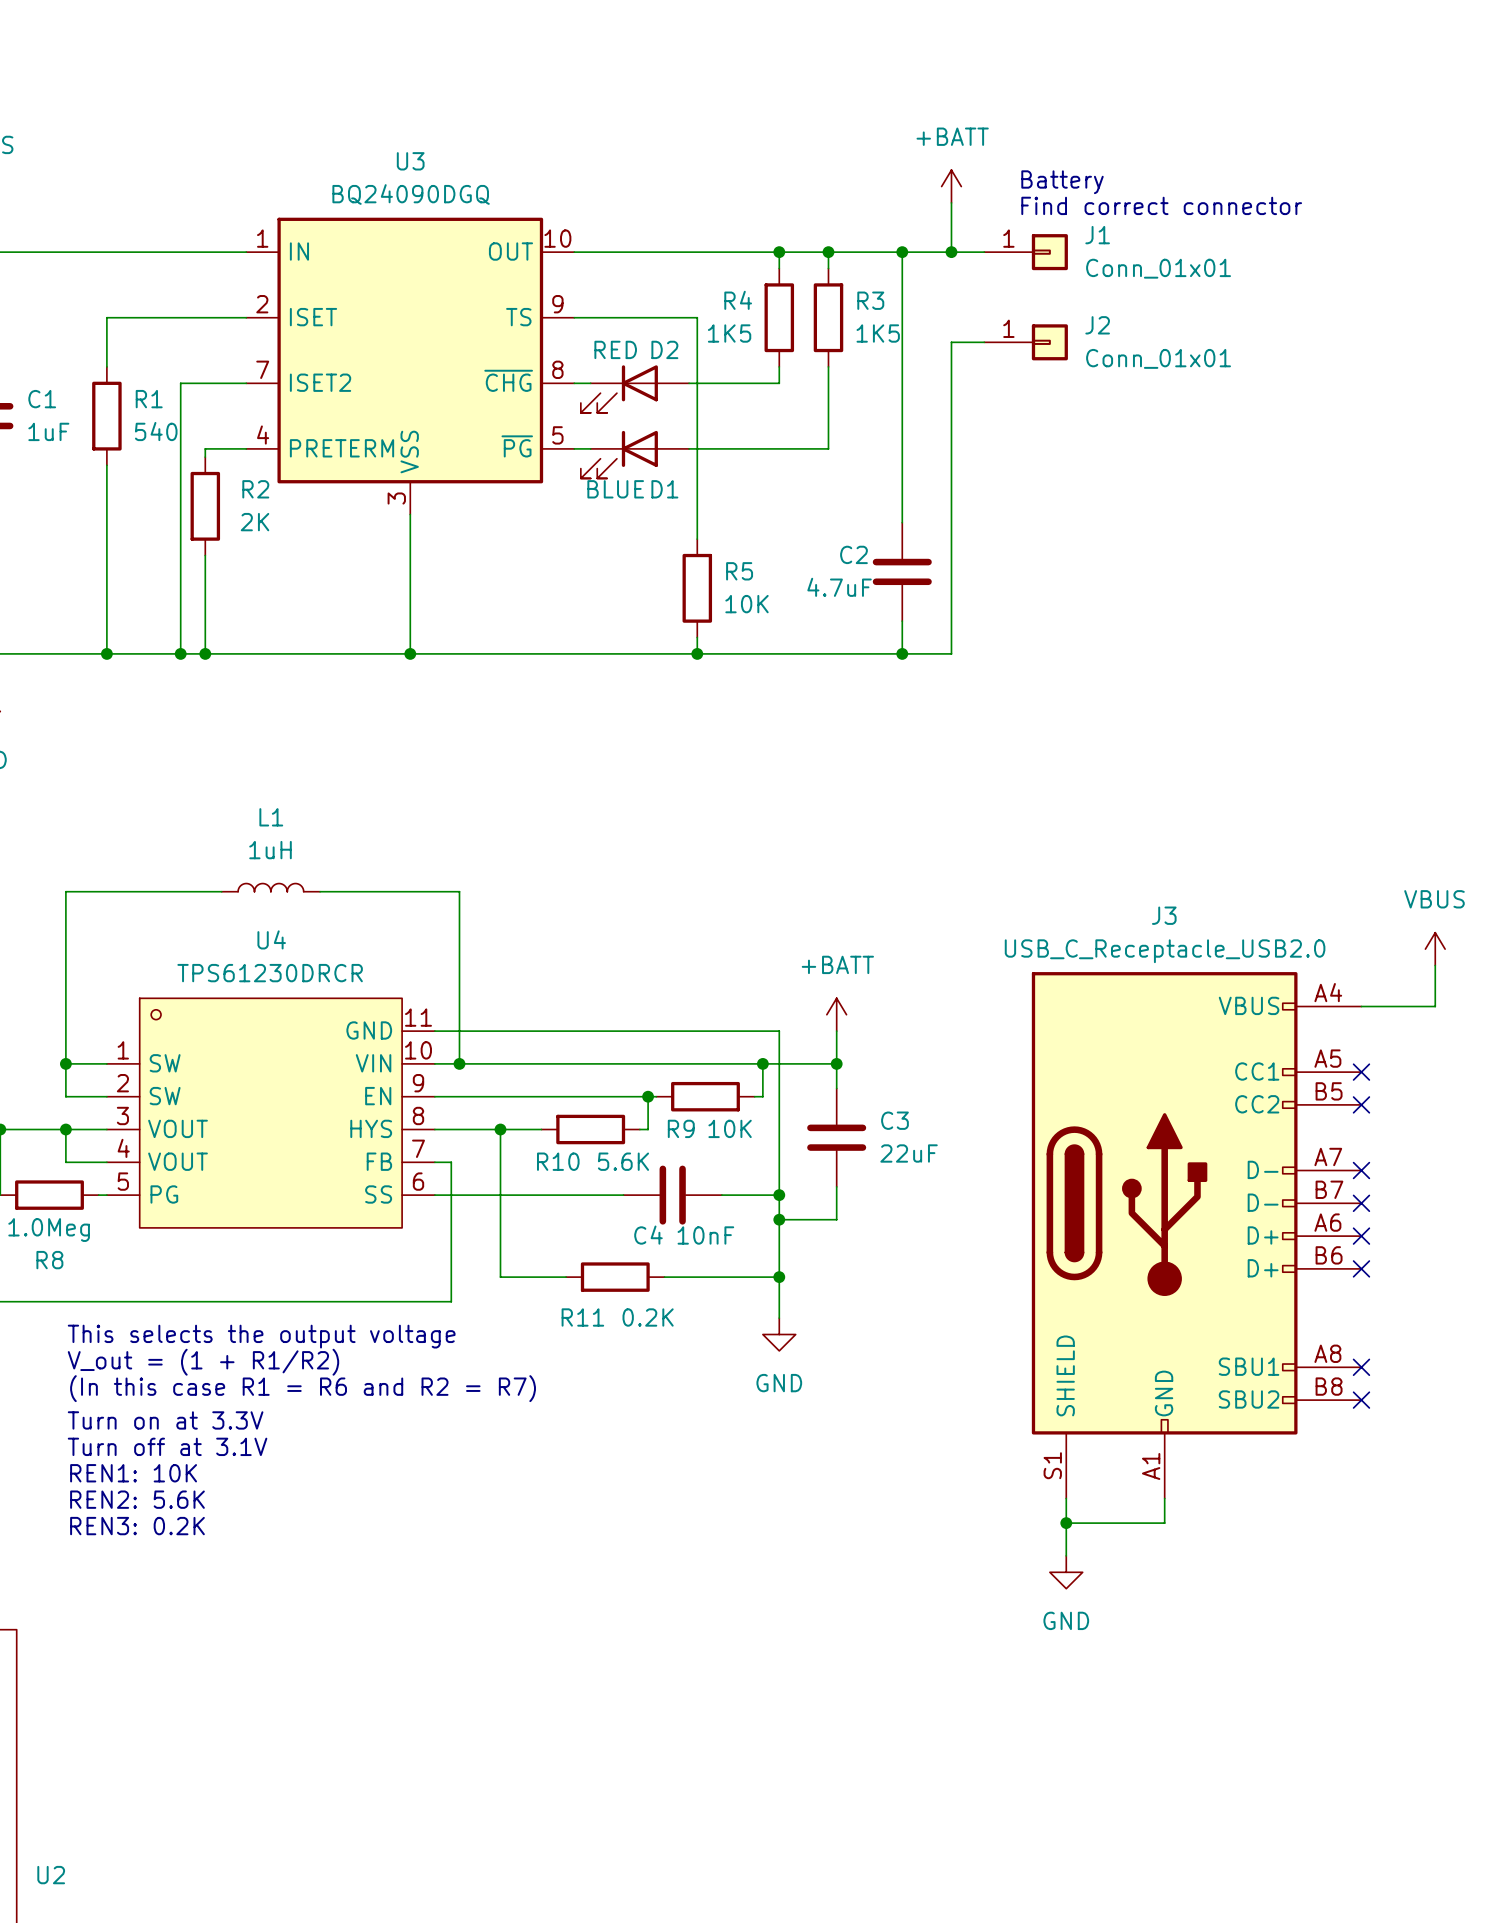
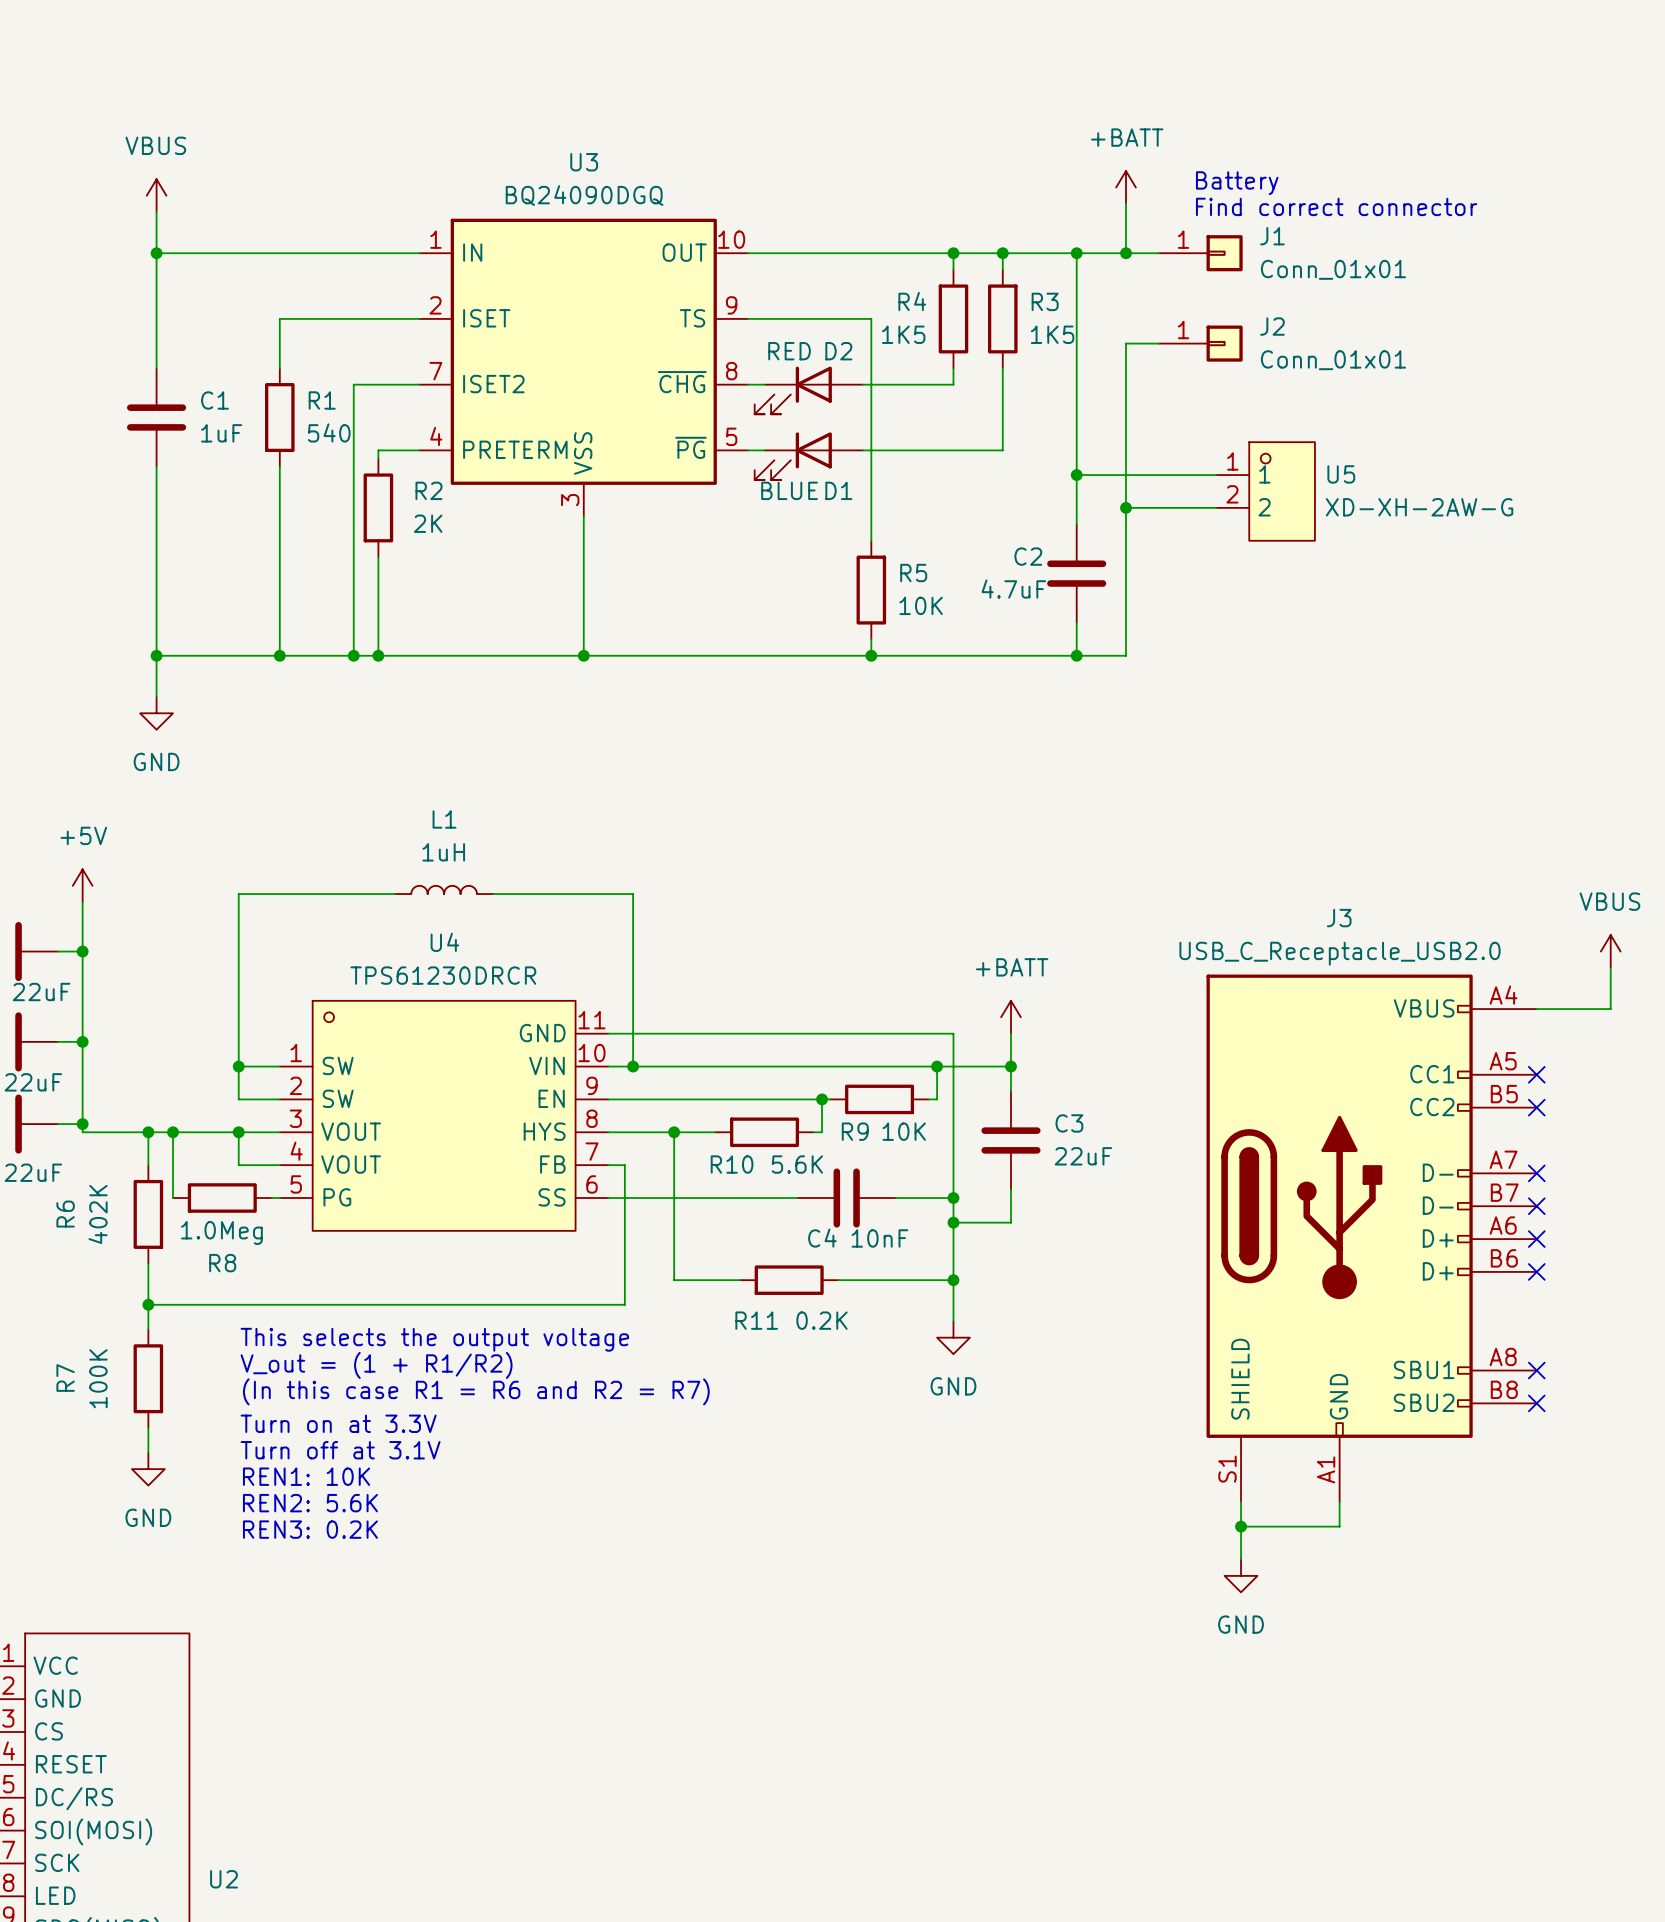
wire: none -> (1076, 475) (1216, 475)
junction: none -> (1076, 475)
U5: none -> XD-XH-2AW-G (1265, 491)
wire: none -> (1126, 507) (1216, 507)
junction: none -> (1126, 507)

